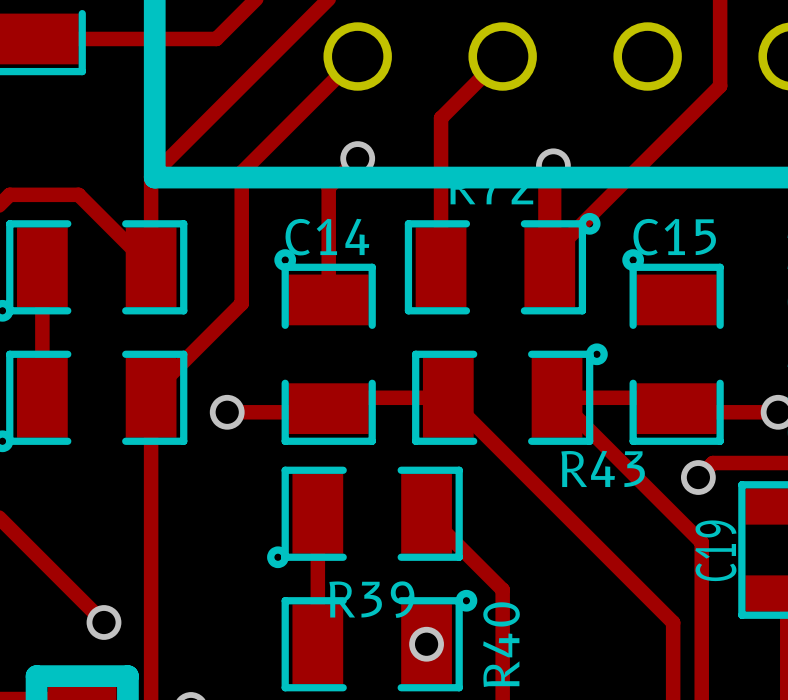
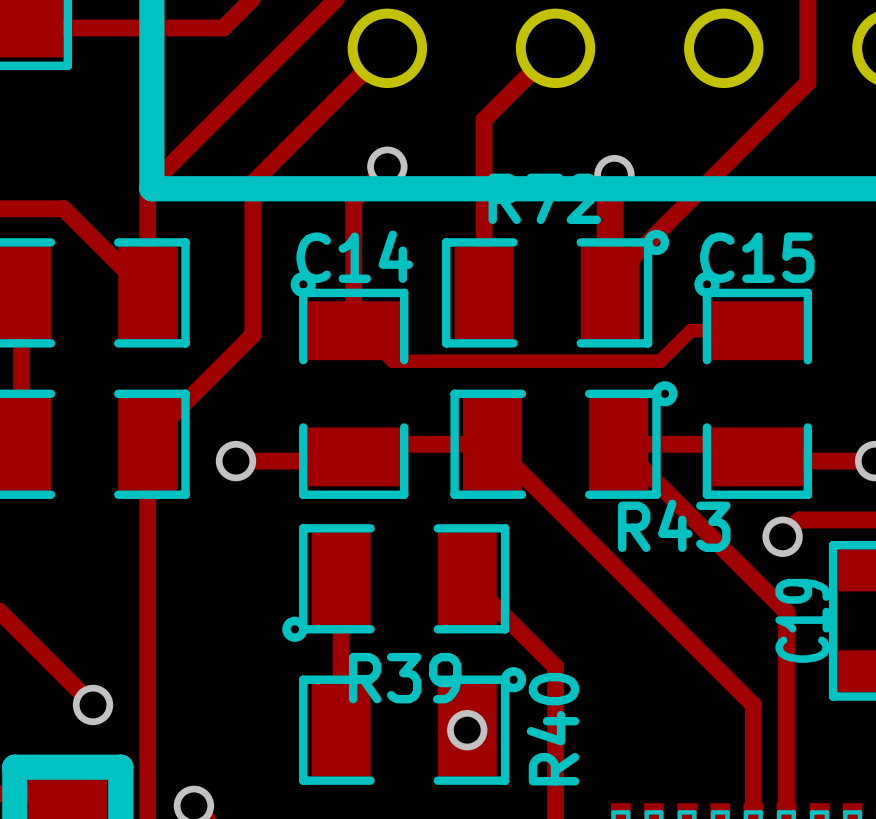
track: none -> (353, 322) (392, 361) (660, 361) (690, 330) (757, 330)

